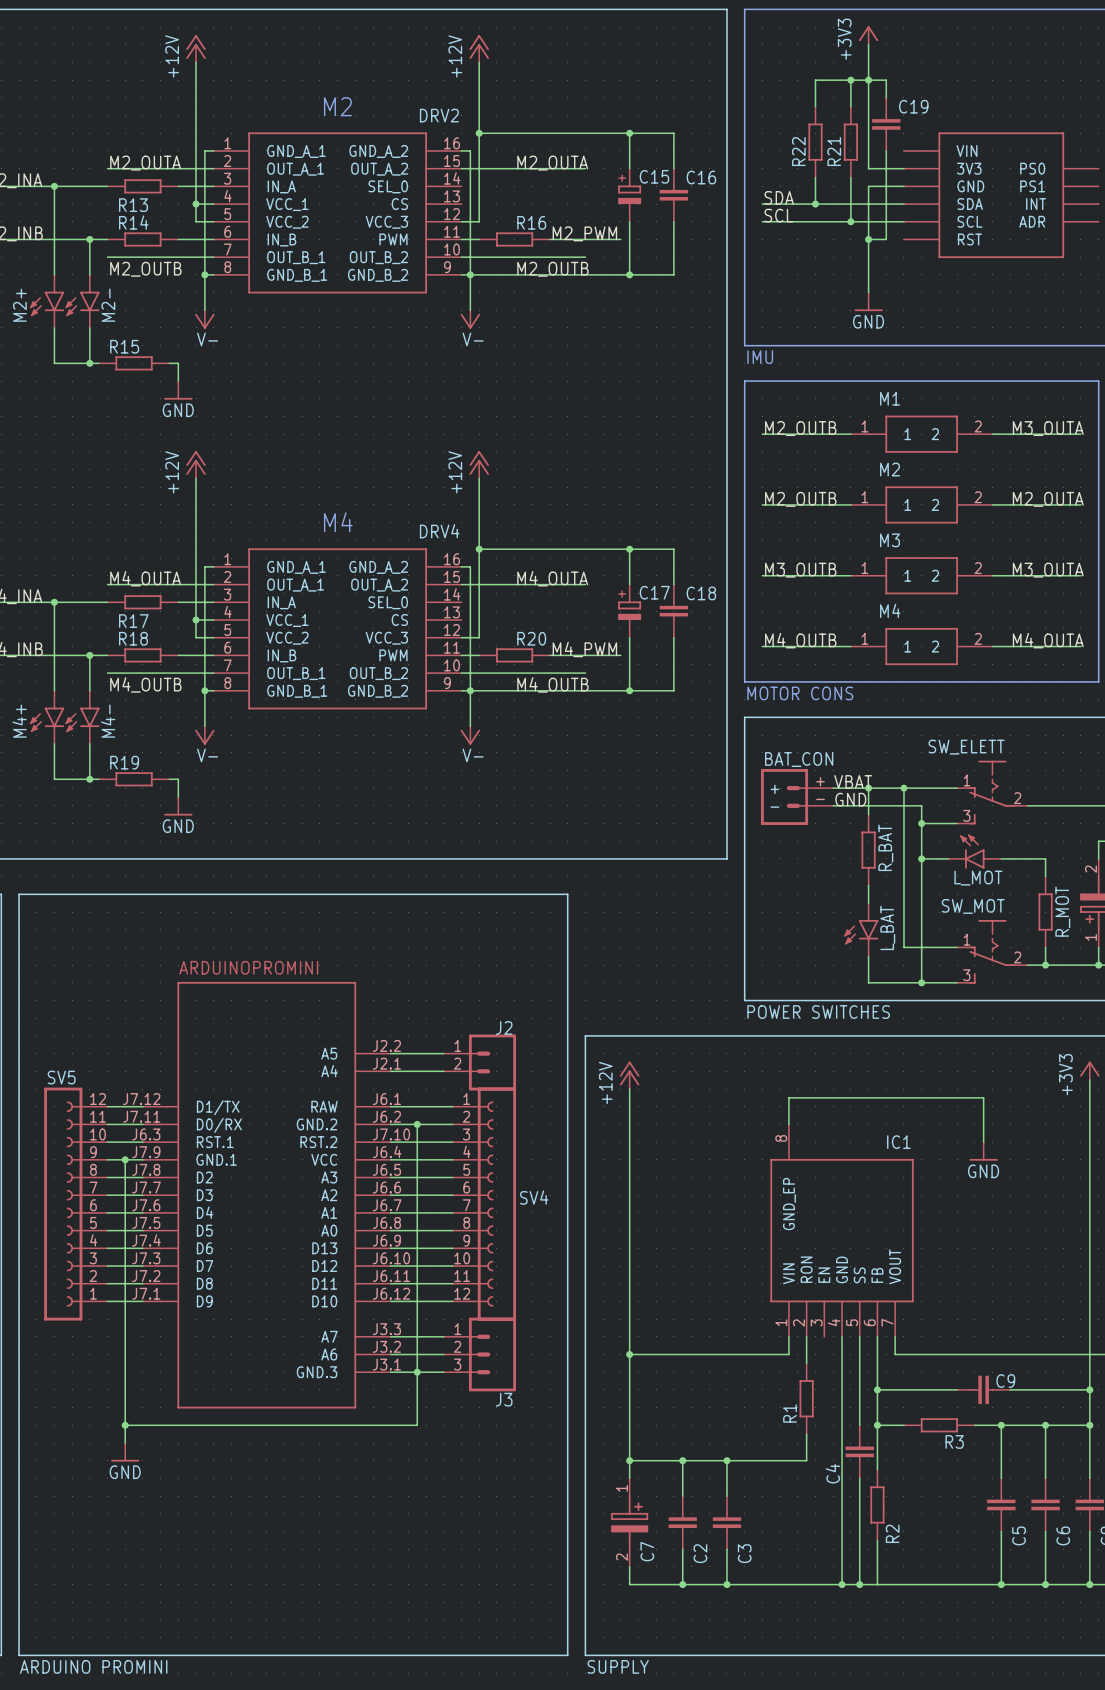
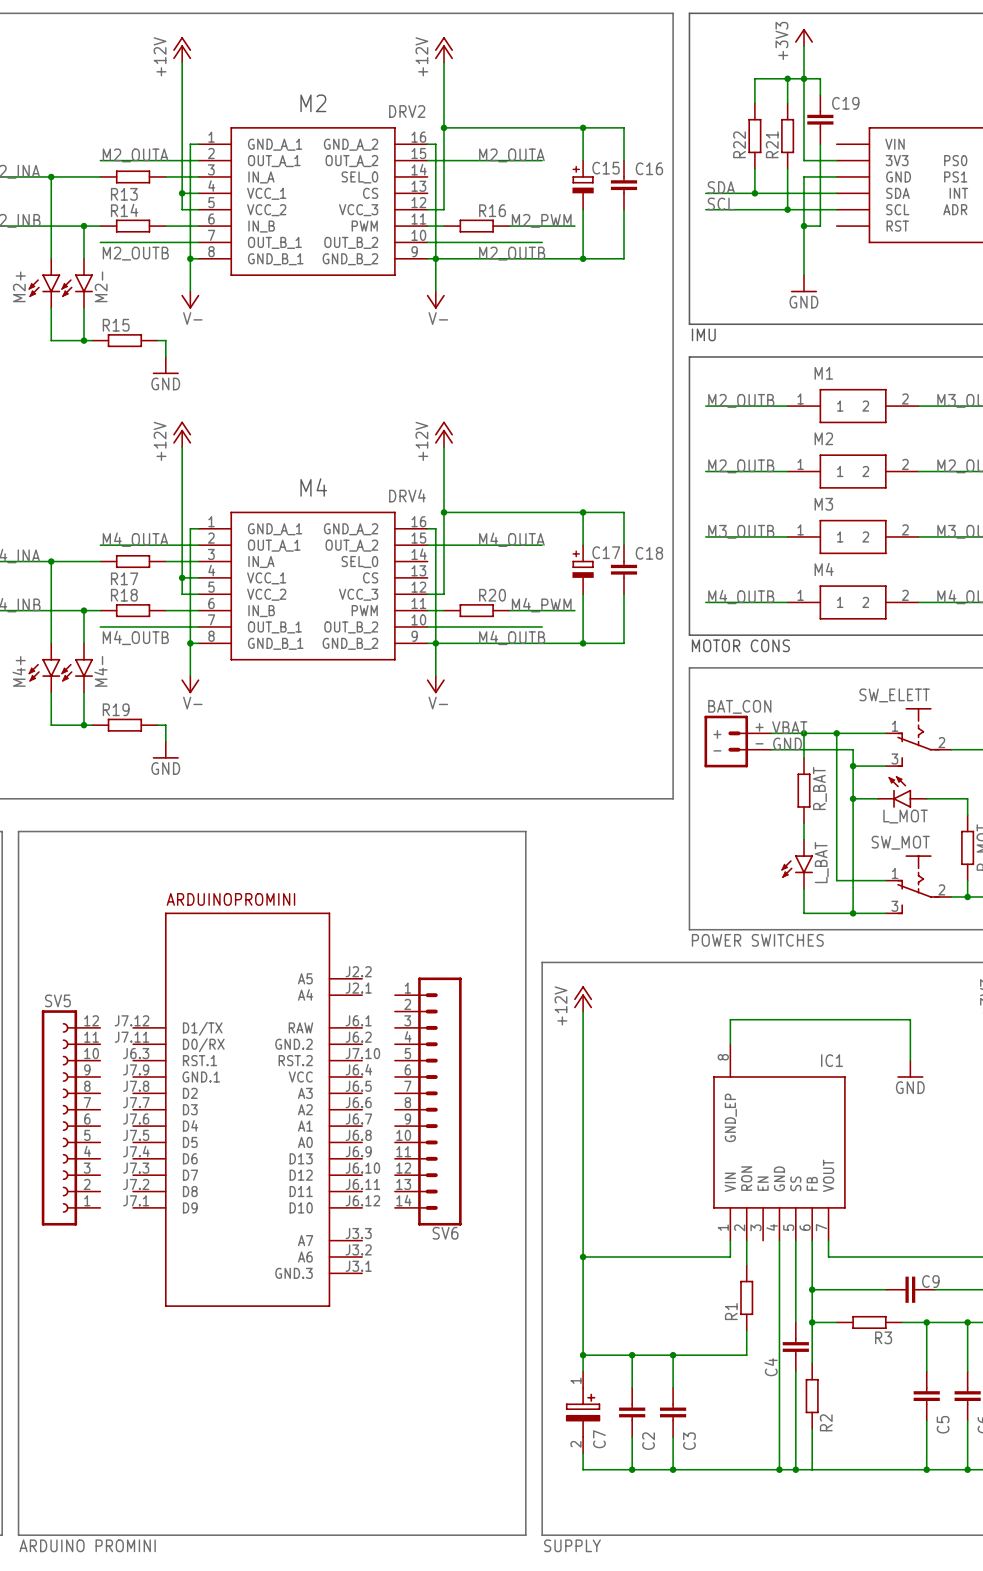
wire: (390, 1053) (443, 1053) -> none
J2: (479, 1062) -> none
wire: (390, 1071) (443, 1071) -> none
wire: (107, 1106) (142, 1106) -> none
wire: (390, 1106) (452, 1106) -> none
wire: (107, 1124) (142, 1124) -> none
wire: (390, 1124) (452, 1124) -> none
wire: (417, 1124) (417, 1425) (125, 1425) -> none
junction: (417, 1124) -> none
wire: (107, 1142) (142, 1142) -> none
wire: (390, 1142) (452, 1142) -> none
wire: (107, 1159) (142, 1159) -> none
wire: (125, 1159) (125, 1443) -> none
junction: (125, 1159) -> none
wire: (390, 1159) (452, 1159) -> none
wire: (107, 1177) (142, 1177) -> none
wire: (390, 1177) (452, 1177) -> none
SV6: none -> (428, 1101)
wire: (107, 1195) (142, 1195) -> none
wire: (390, 1195) (452, 1195) -> none
SV4: (484, 1204) -> none
wire: (107, 1212) (142, 1212) -> none
wire: (390, 1212) (452, 1212) -> none
wire: (107, 1230) (142, 1230) -> none
wire: (390, 1230) (452, 1230) -> none
wire: (107, 1248) (142, 1248) -> none
wire: (390, 1248) (452, 1248) -> none
wire: (107, 1266) (142, 1266) -> none
wire: (390, 1266) (452, 1266) -> none
wire: (107, 1283) (142, 1283) -> none
wire: (390, 1283) (452, 1283) -> none
wire: (107, 1301) (142, 1301) -> none
wire: (390, 1301) (452, 1301) -> none
wire: (390, 1336) (443, 1336) -> none
wire: (390, 1354) (443, 1354) -> none
J3: (479, 1354) -> none
wire: (390, 1372) (443, 1372) -> none
junction: (417, 1372) -> none
junction: (125, 1425) -> none
power symbol: GND (125, 1452) -> none

